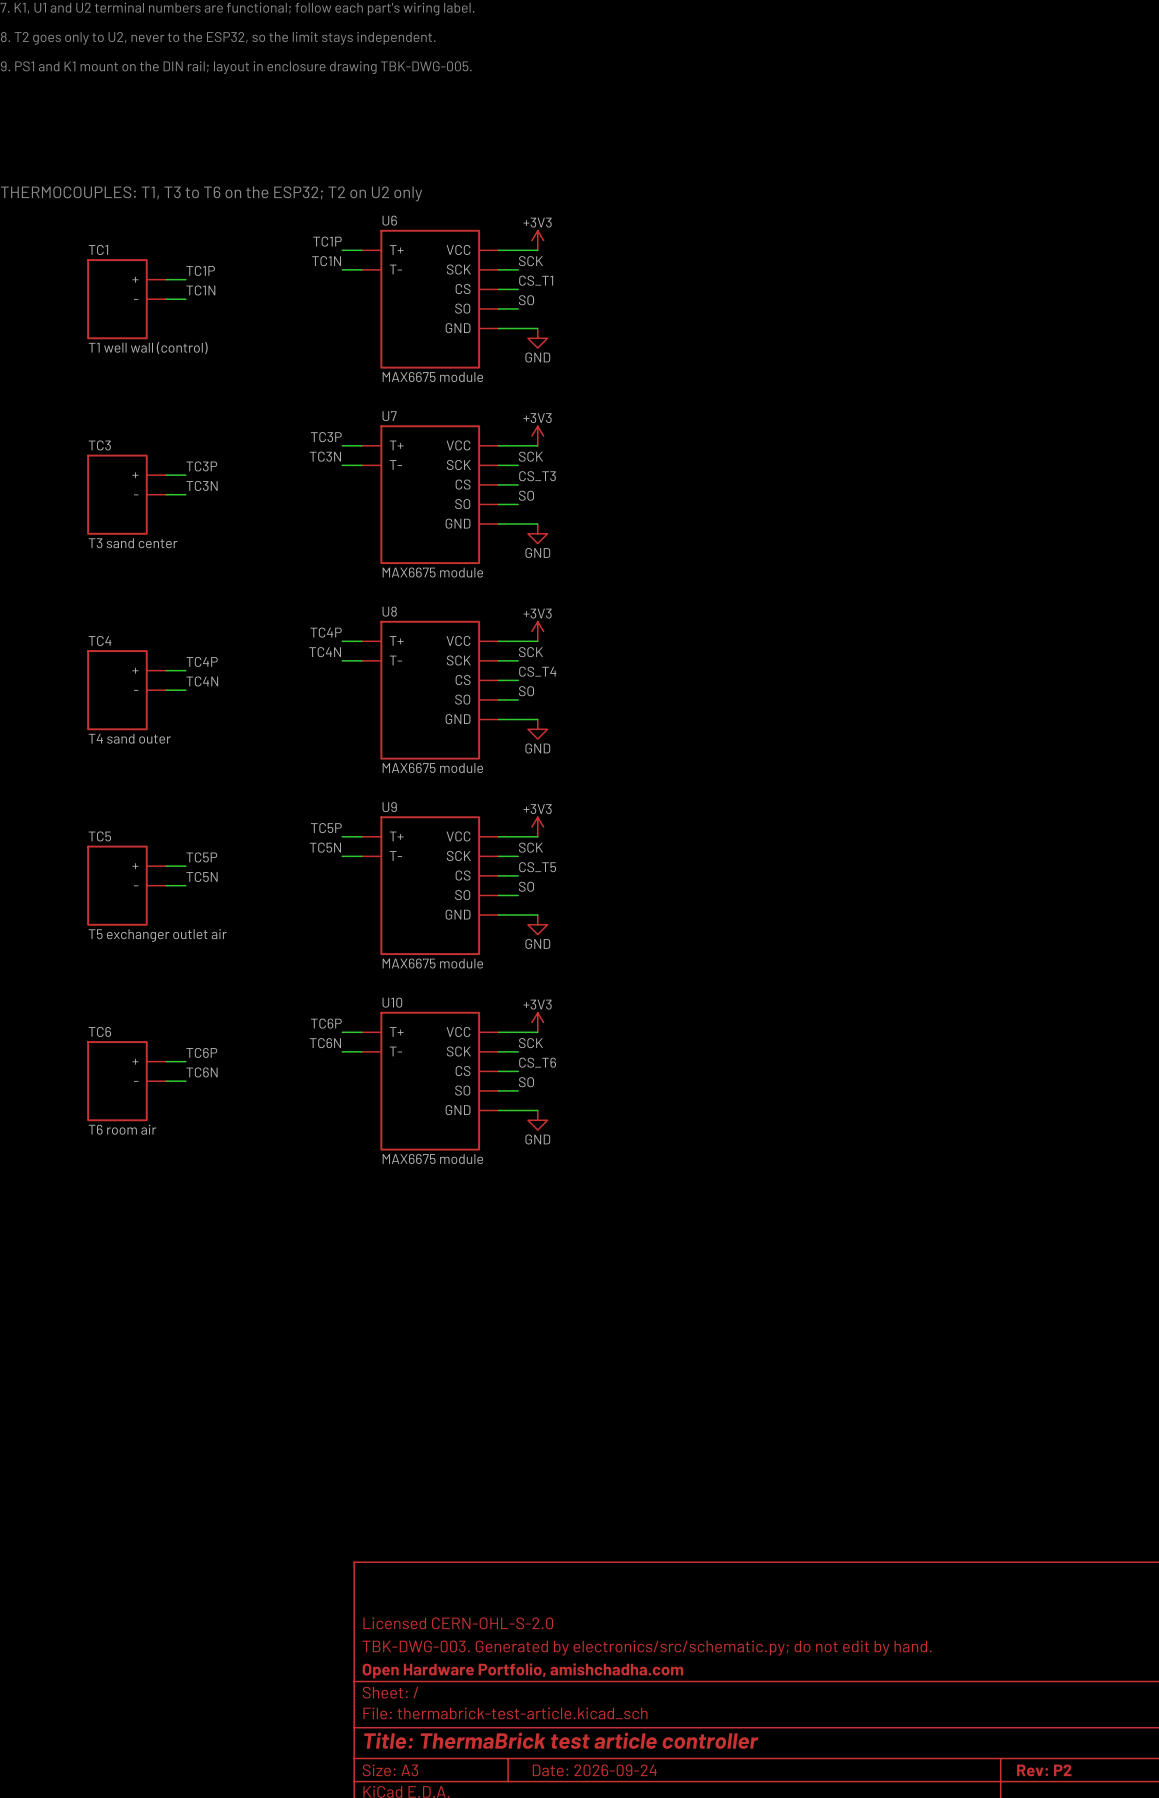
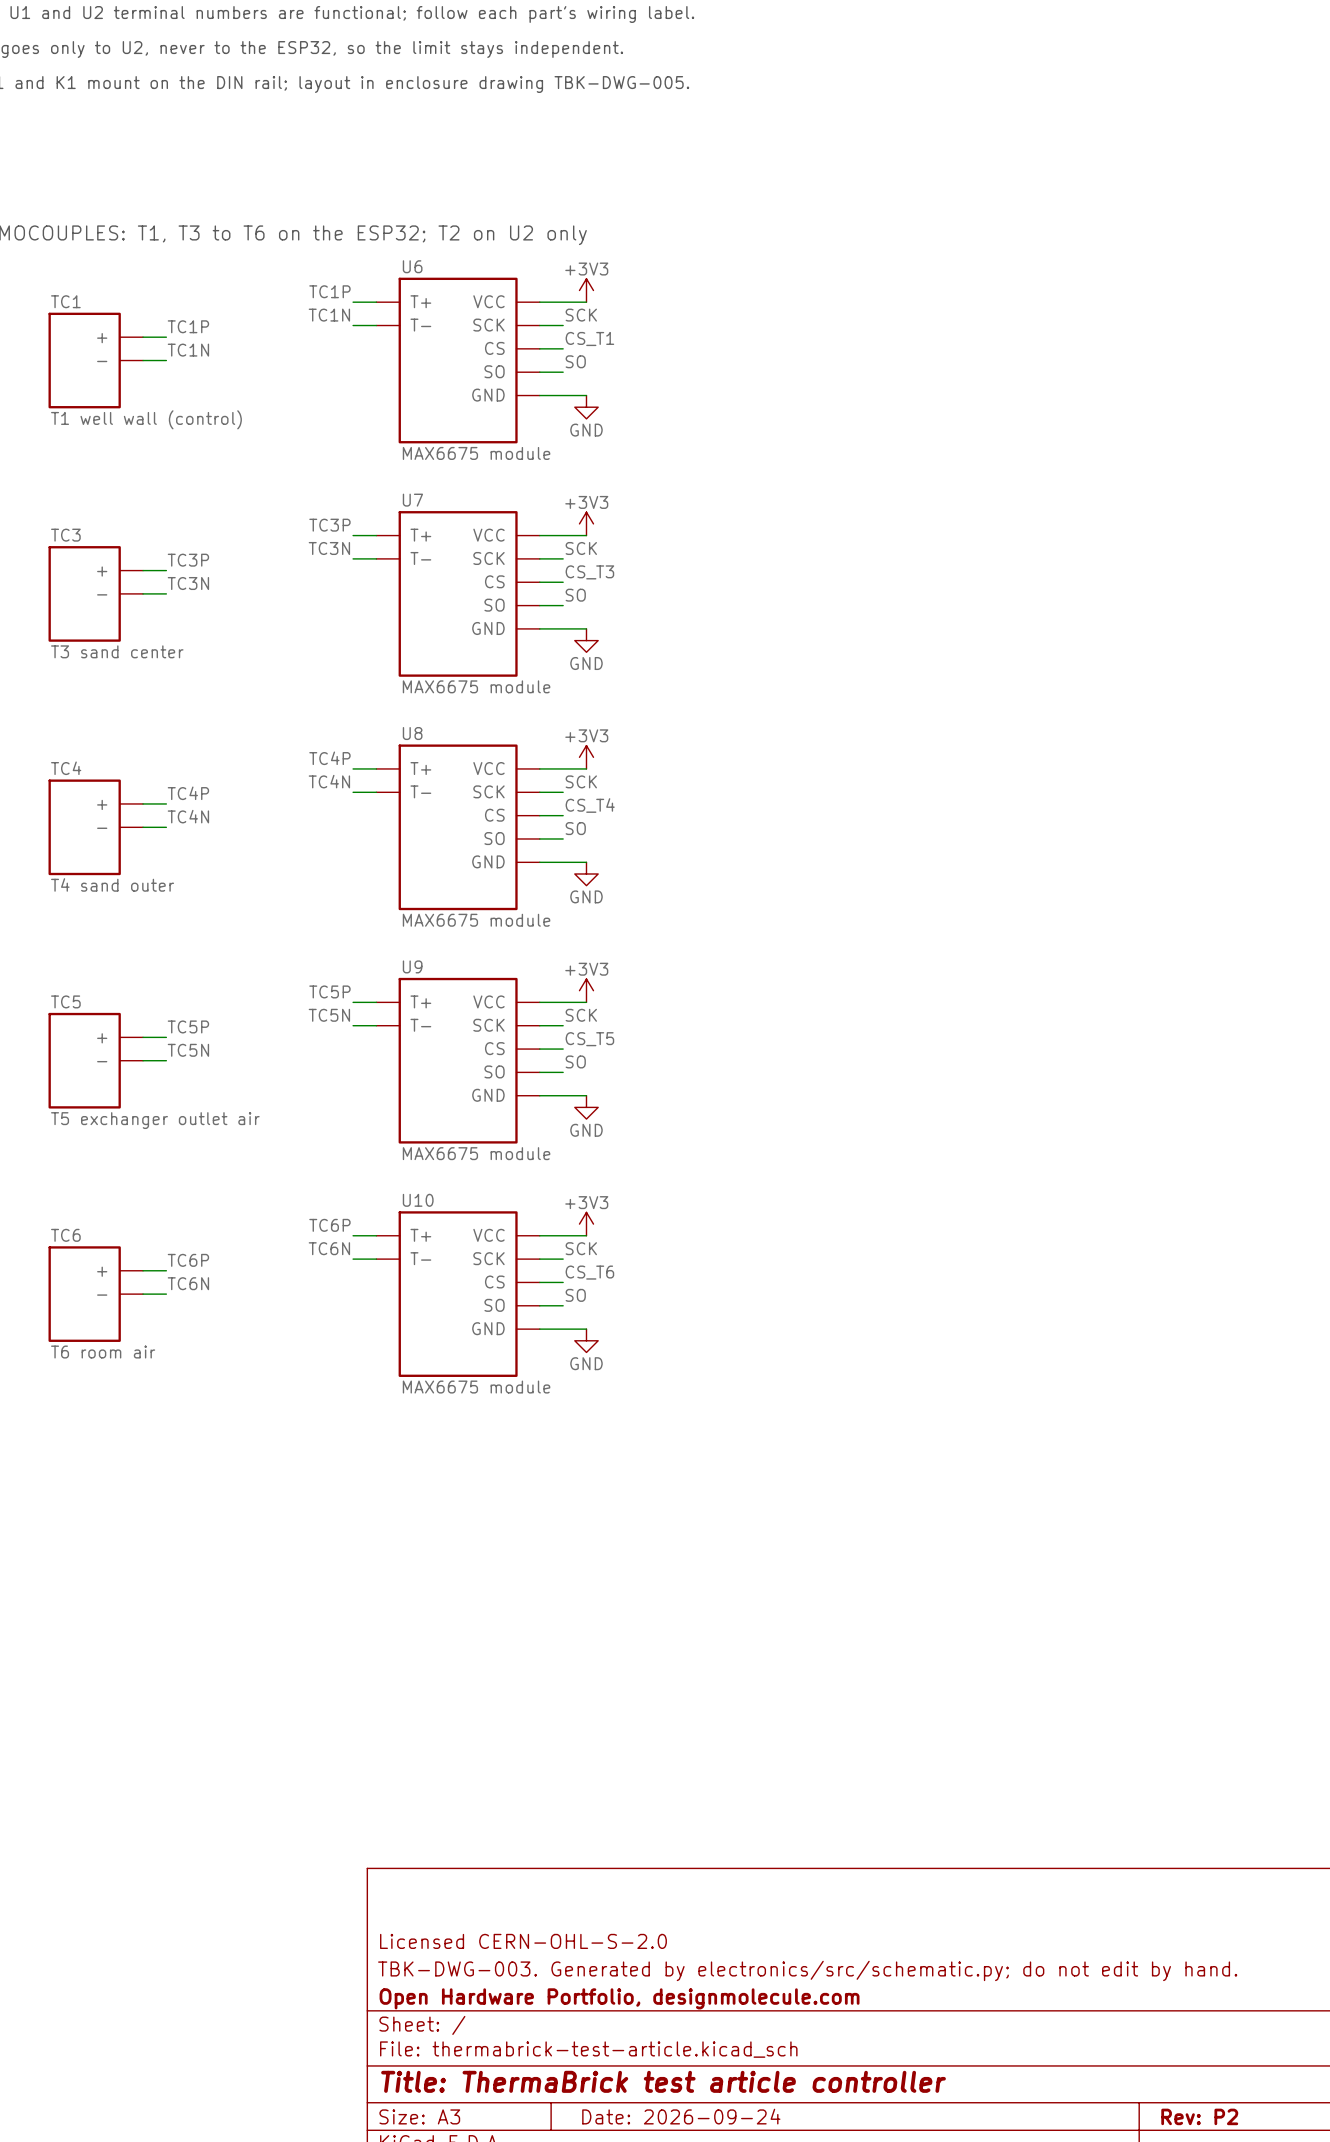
title block: Open Hardware Portfolio, amishchadha.com (522, 1670) -> Open Hardware Portfolio, designmolecule.com (619, 1998)

